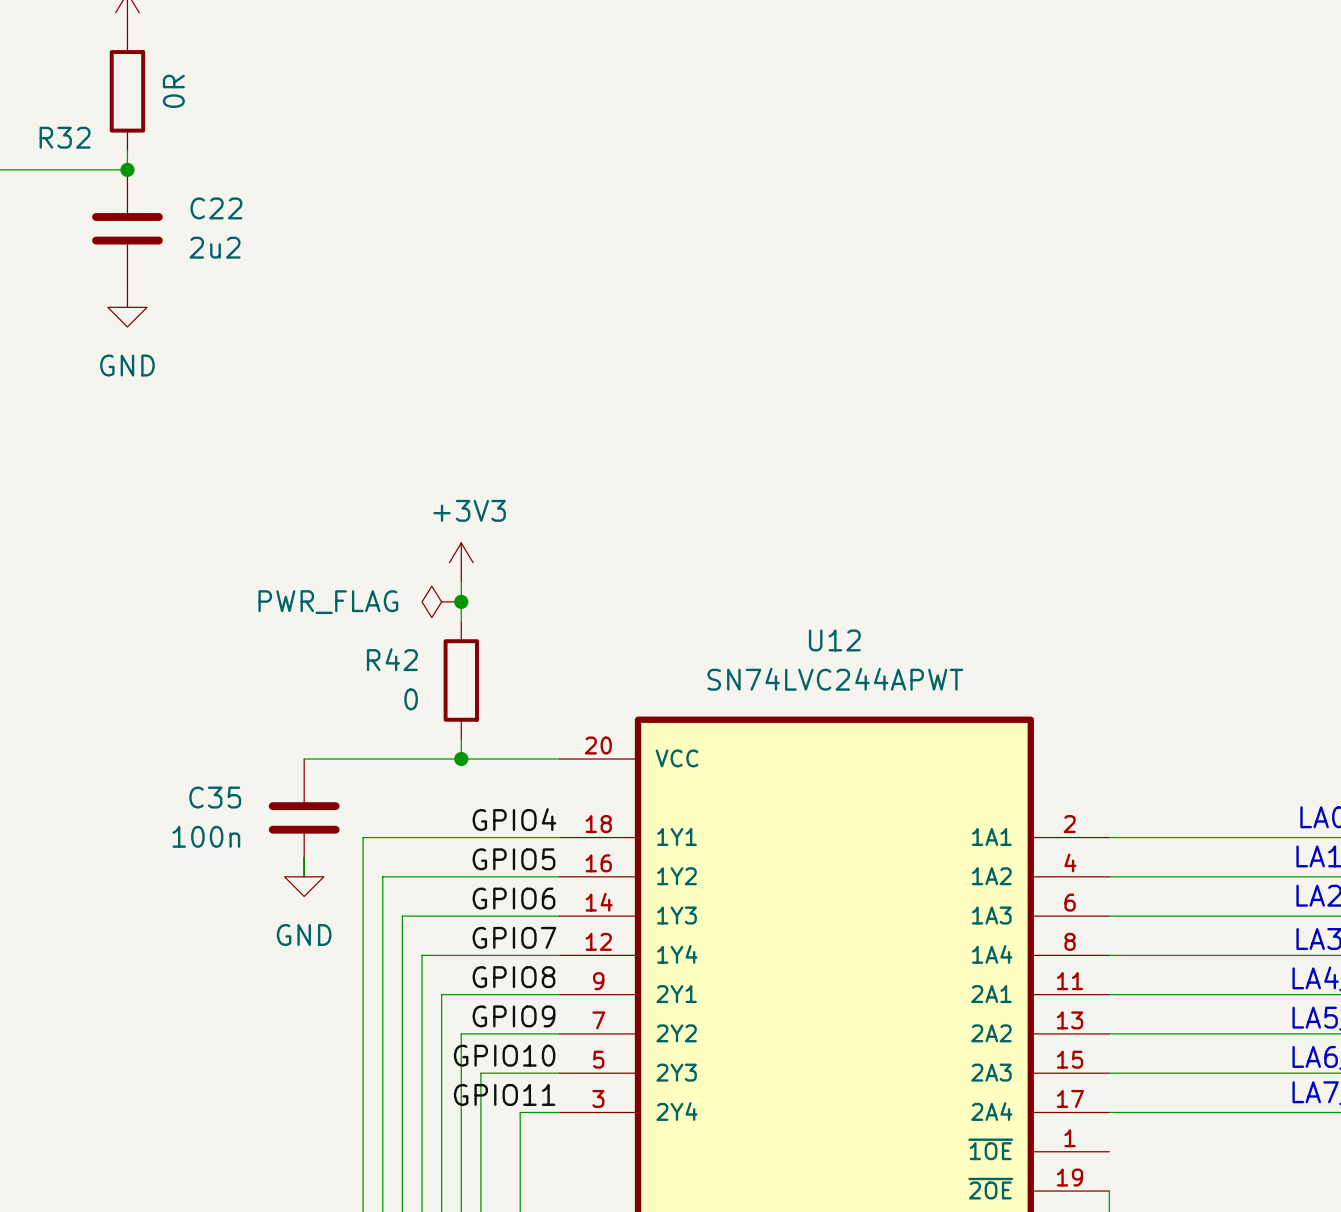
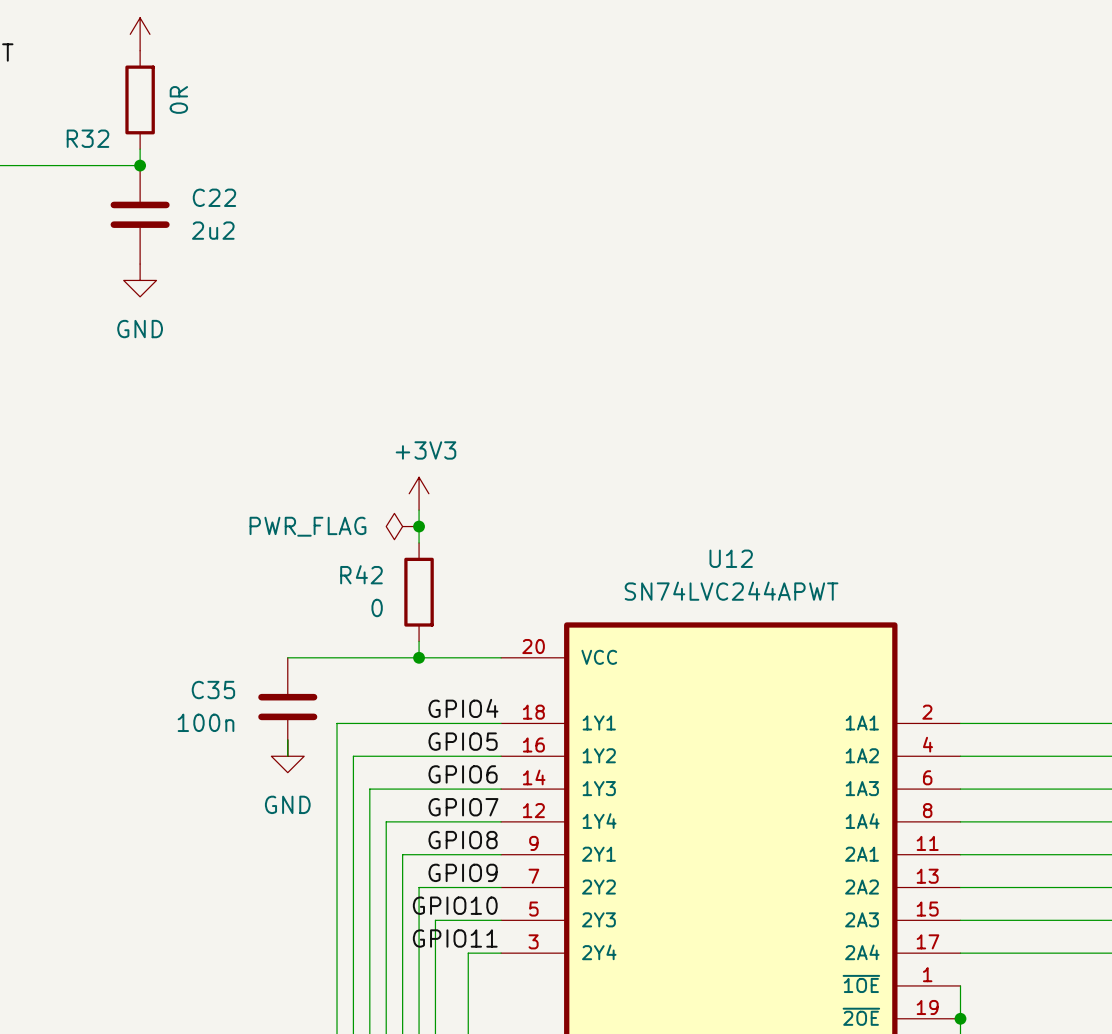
wire: none -> (960, 985) (960, 1018)
junction: none -> (960, 1018)

